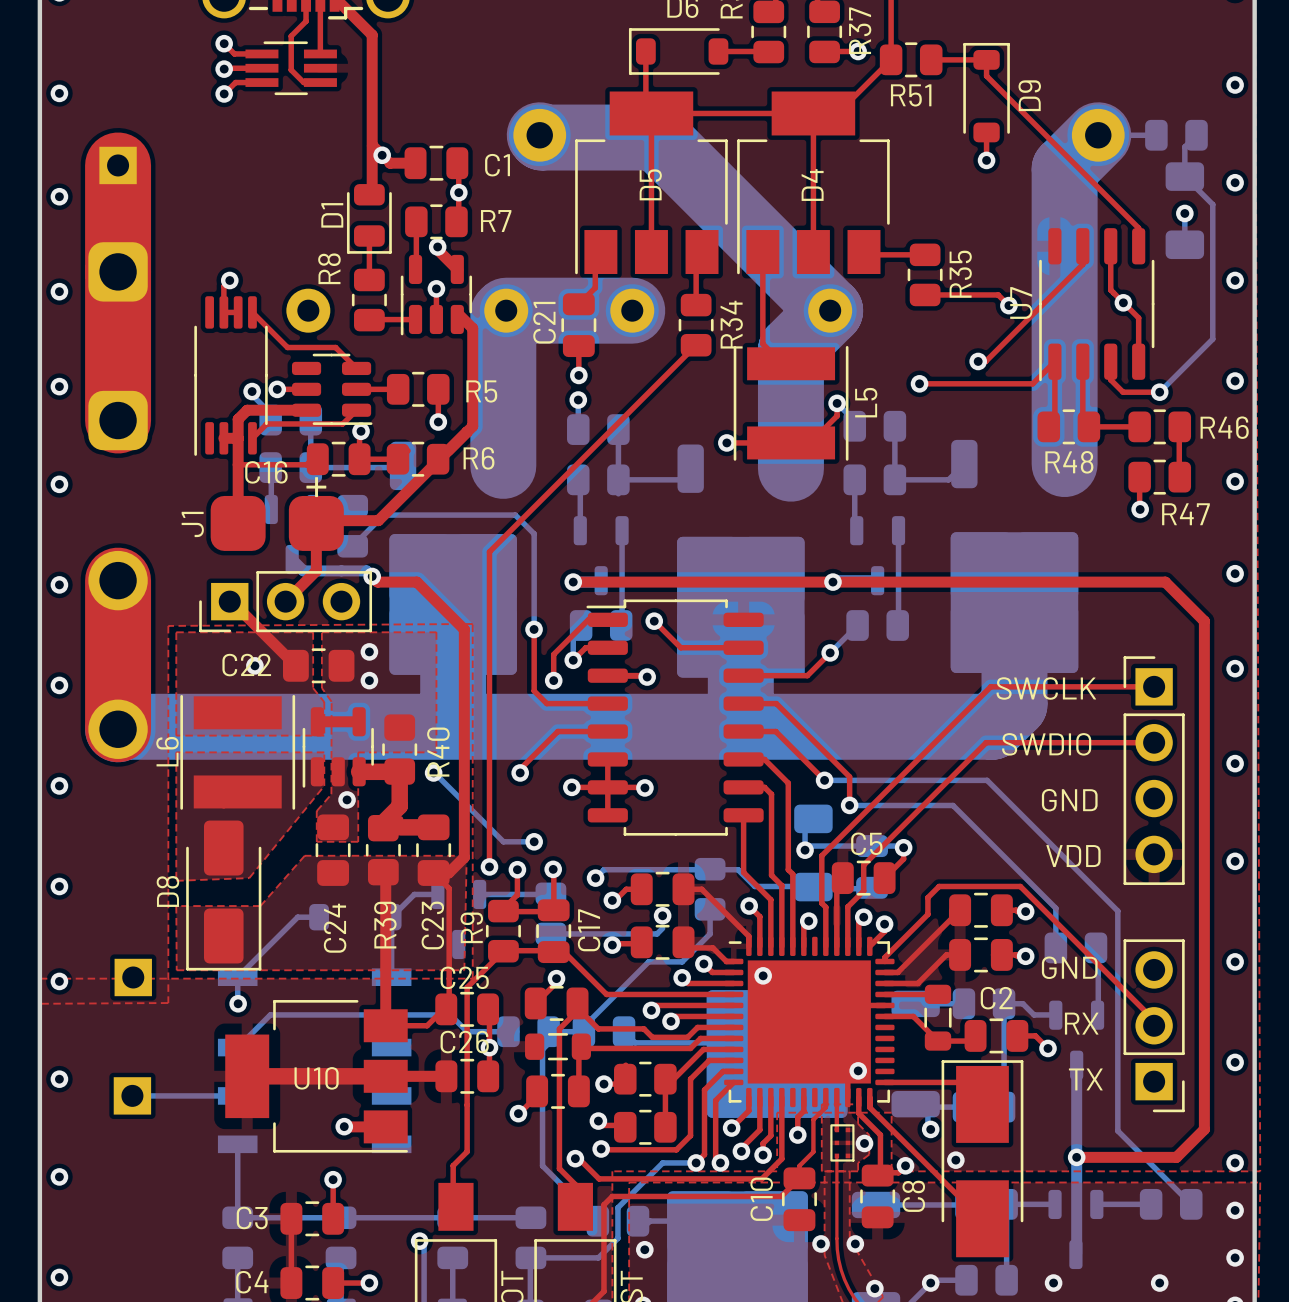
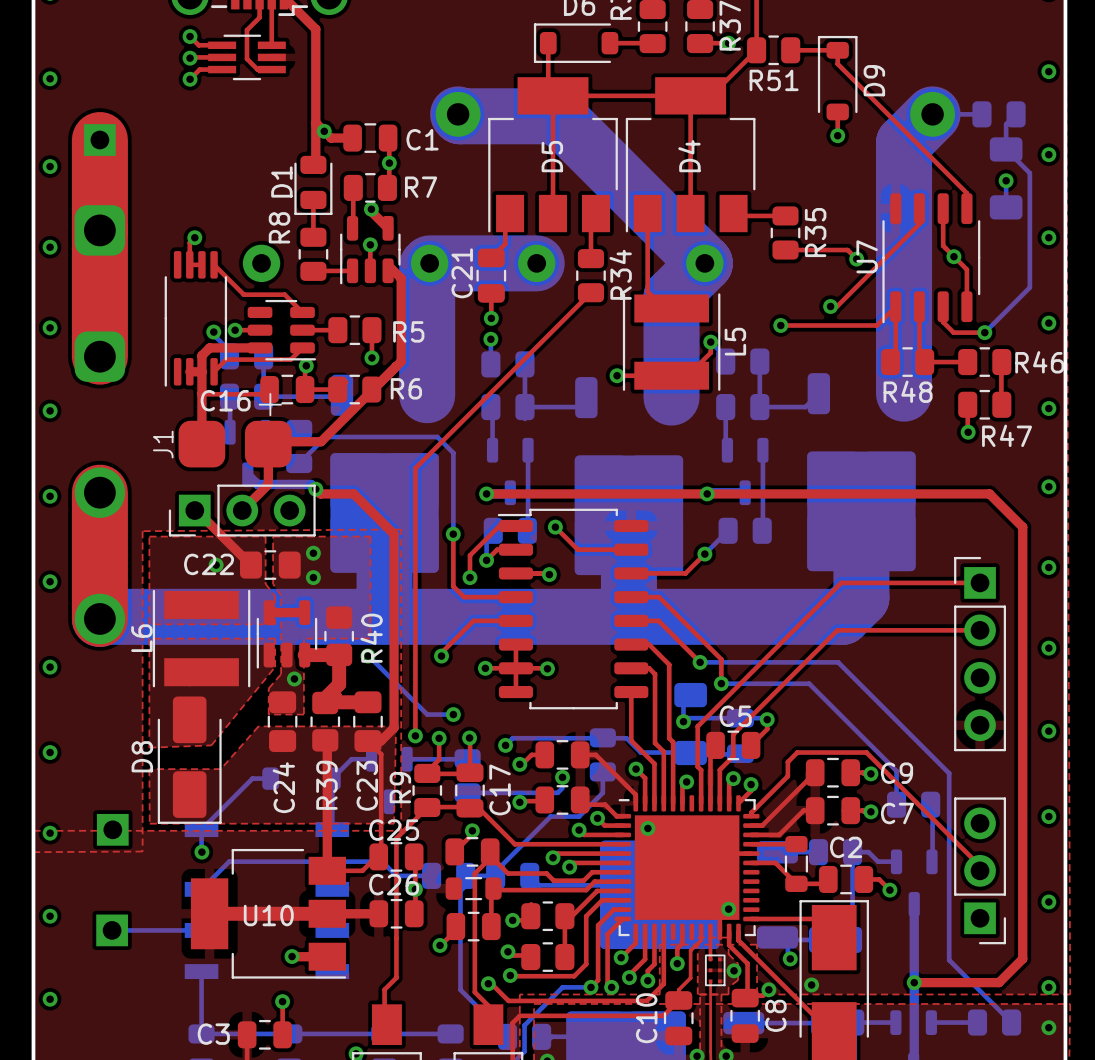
text: SWCLK (1046, 688) -> none
text: SWDIO (1046, 744) -> none
text: GND (1069, 800) -> none
text: VDD (1073, 856) -> none
C9 name: none -> C9 (897, 773)
C7 name: none -> C7 (897, 813)
text: GND (1069, 967) -> none
text: RX (1081, 1023) -> none
text: TX (1085, 1079) -> none

